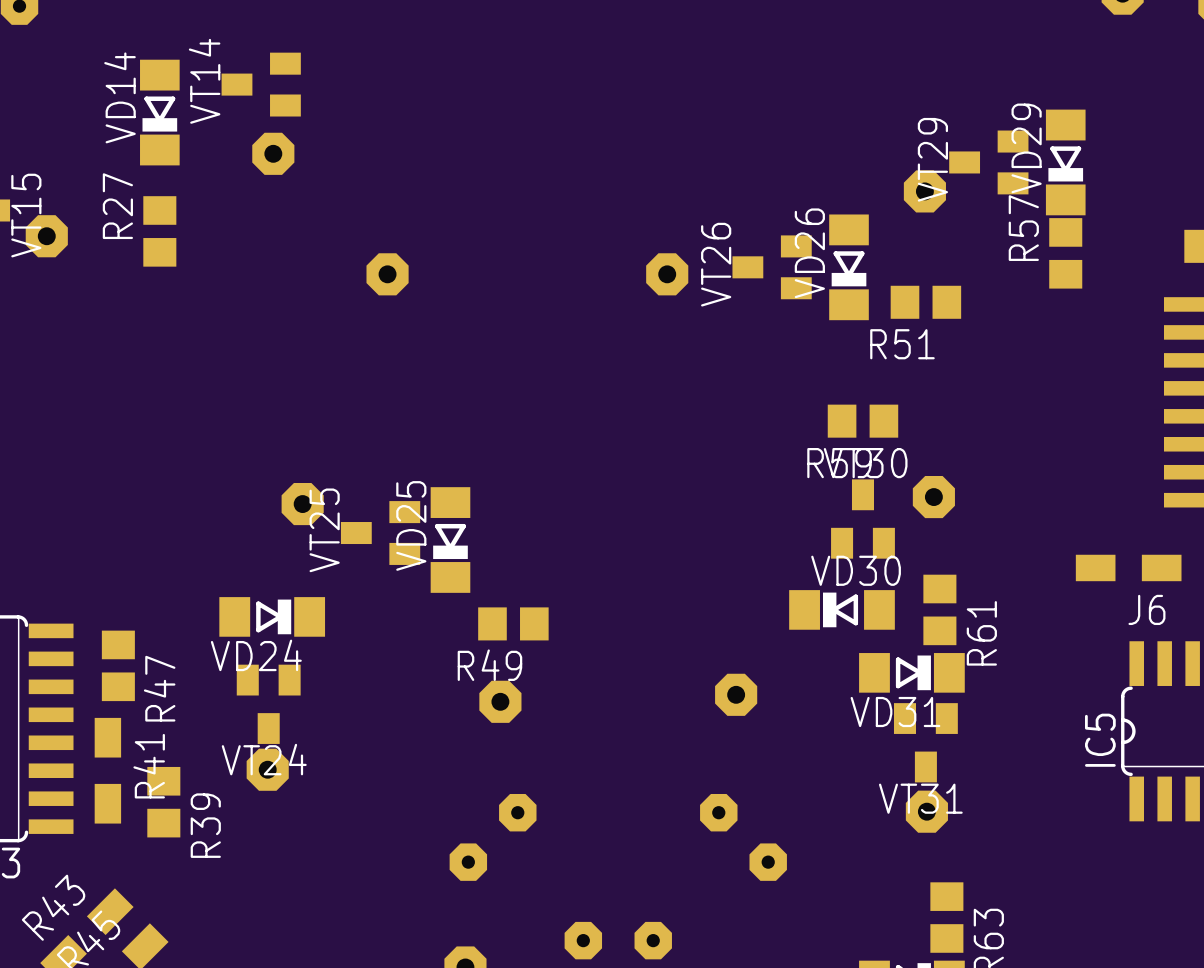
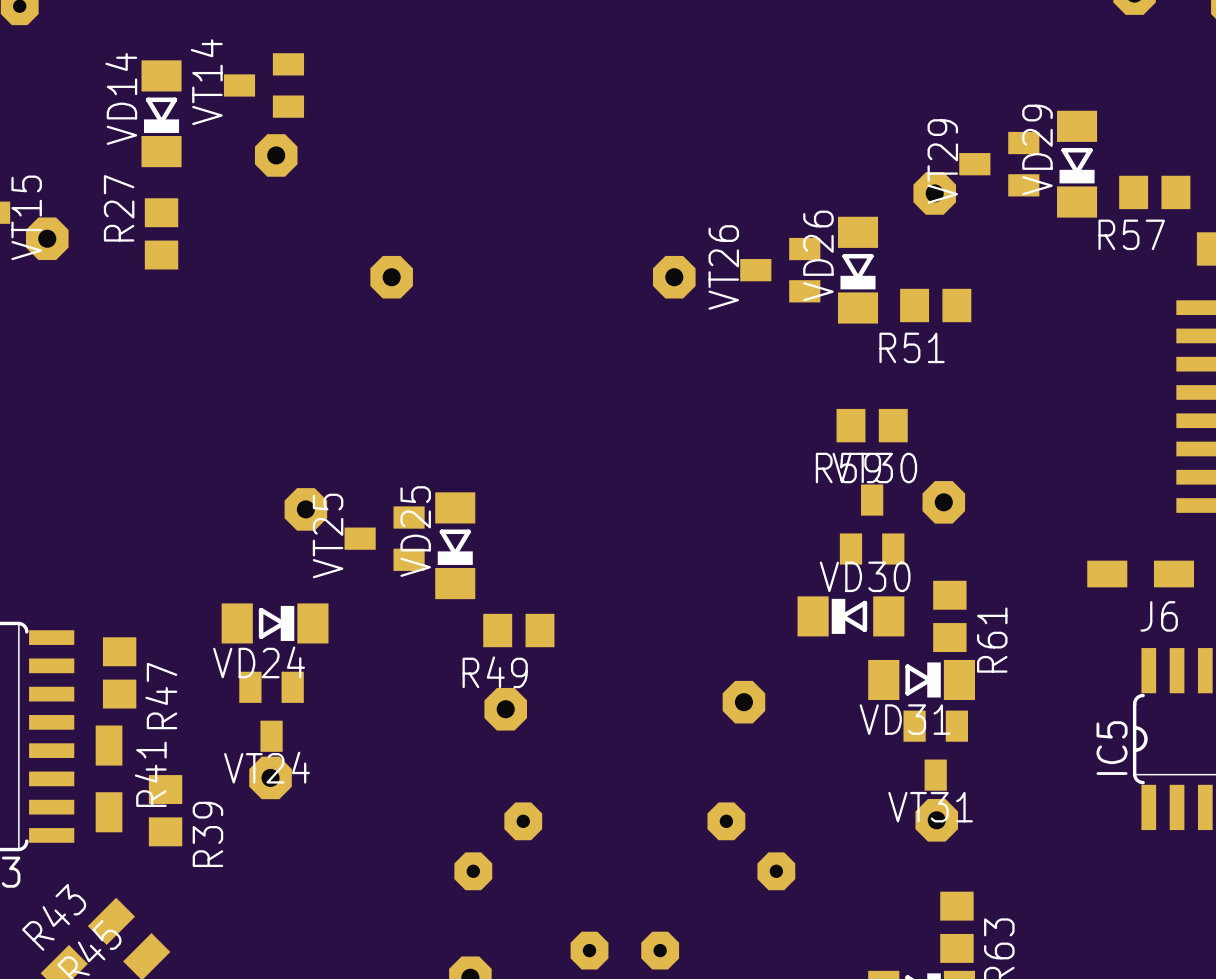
R57 name position: R57 (1023, 228) -> R57 (1131, 234)
R57 rotation: 0° (1065, 253) -> 90° clockwise (1154, 192)
R57 position: (1065, 253) -> (1154, 192)

